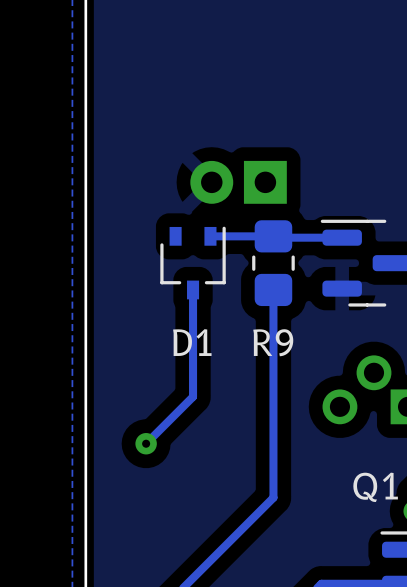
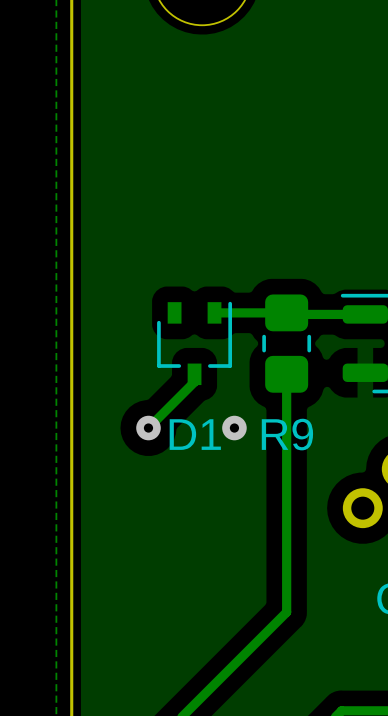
part: (238, 182) -> none
track: (193, 296) (193, 396) (146, 443) -> (194, 381) (148, 428)
via: none -> (148, 428)
via: none -> (234, 428)
via: (146, 443) -> none

